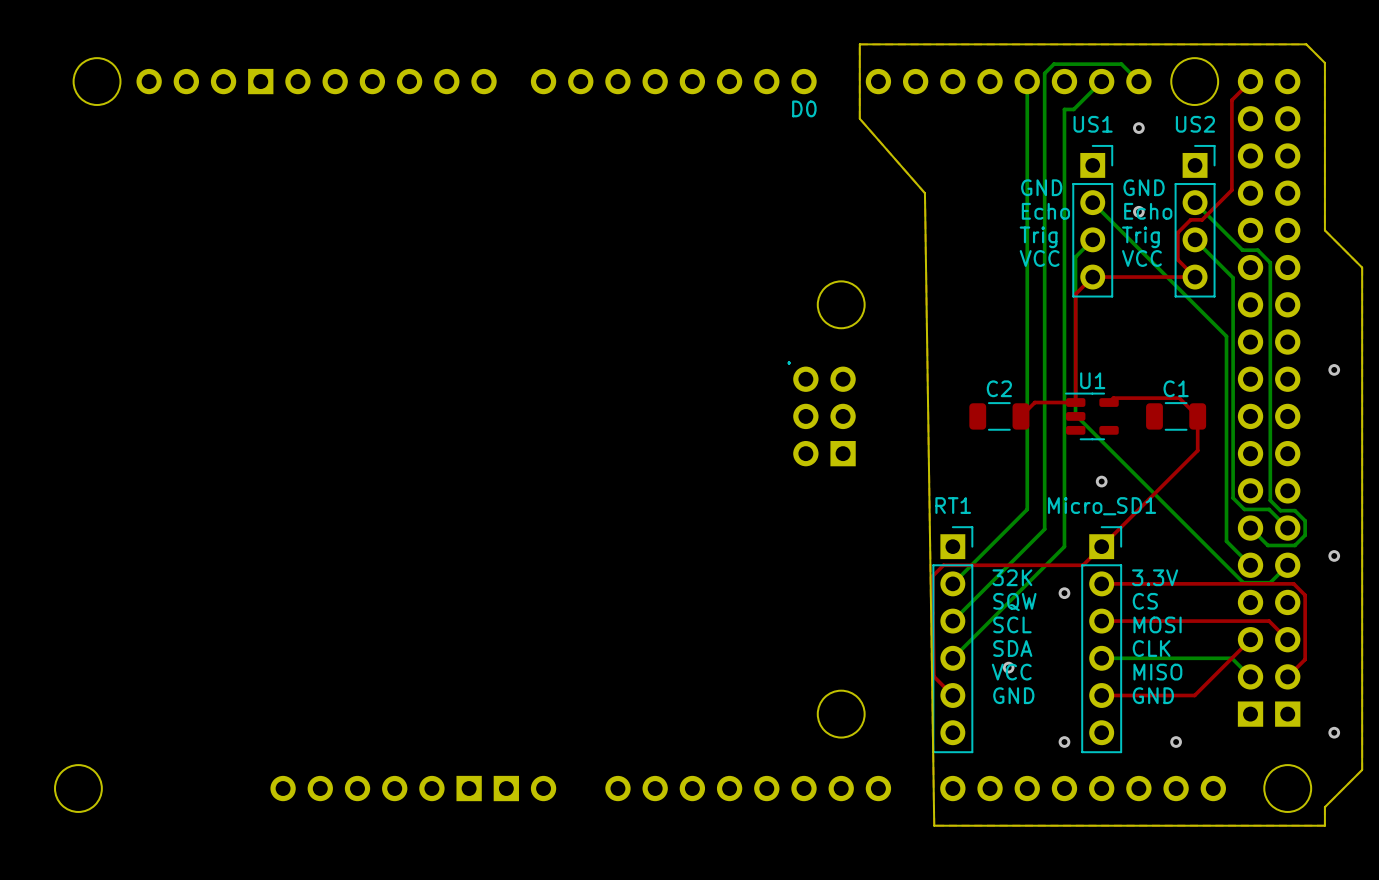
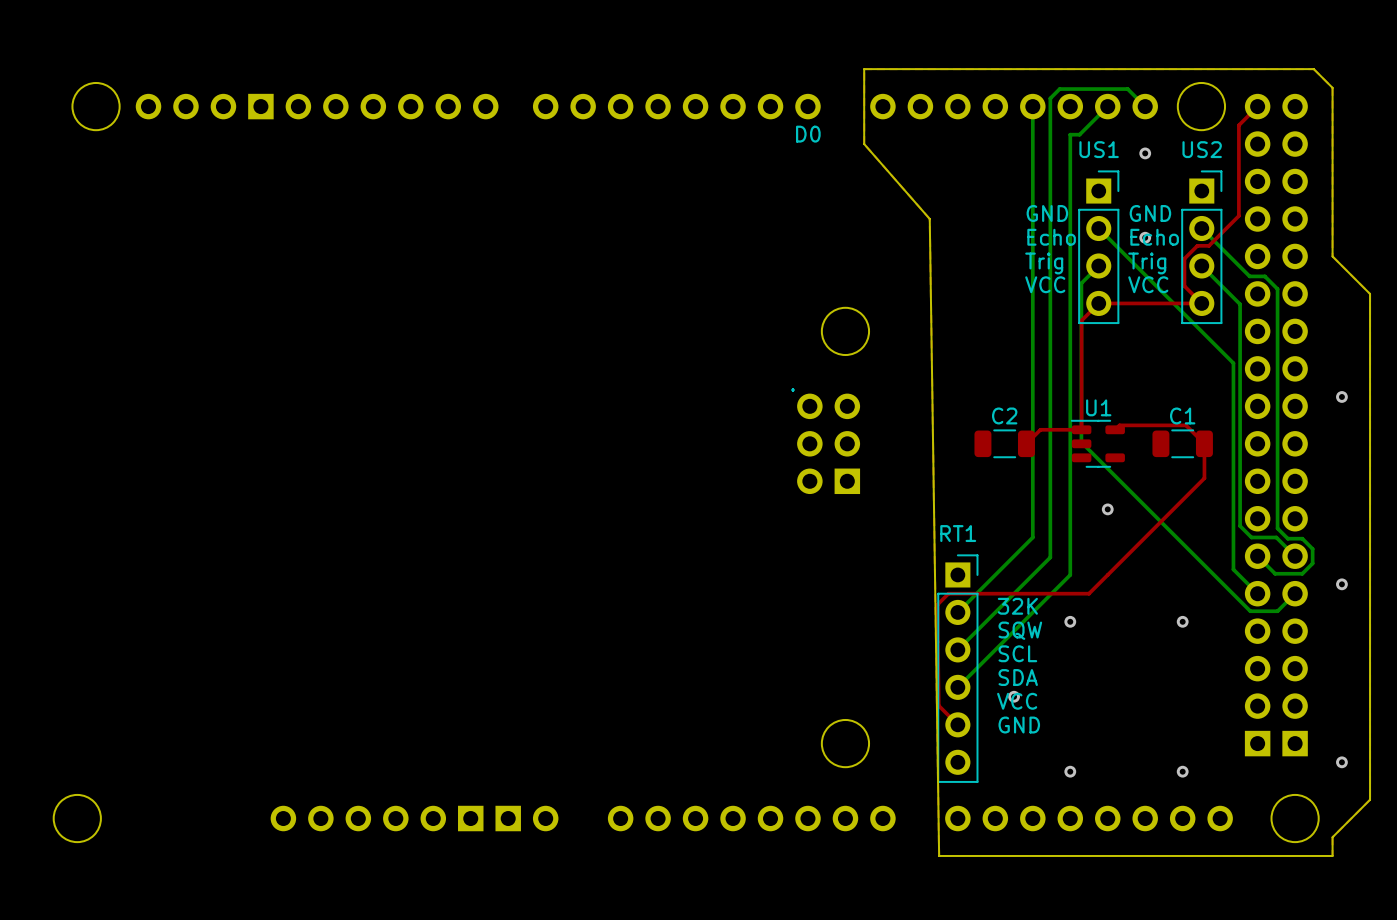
text: 3.3V (1155, 577) -> none
top track: (1101, 583) (1293, 583) (1305, 595) (1305, 659) (1287, 676) -> none
via: none -> (1182, 621)
text: CS (1145, 601) -> none
top track: (1101, 621) (1269, 621) (1287, 639) -> none
text: MOSI (1157, 624) -> none
Micro_SD1: (1101, 639) -> none
top track: (1250, 639) (1194, 695) (1101, 695) -> none
text: CLK (1151, 648) -> none
bottom track: (1101, 658) (1231, 658) (1250, 676) -> none
text: MISO (1157, 672) -> none
text: GND (1153, 695) -> none

